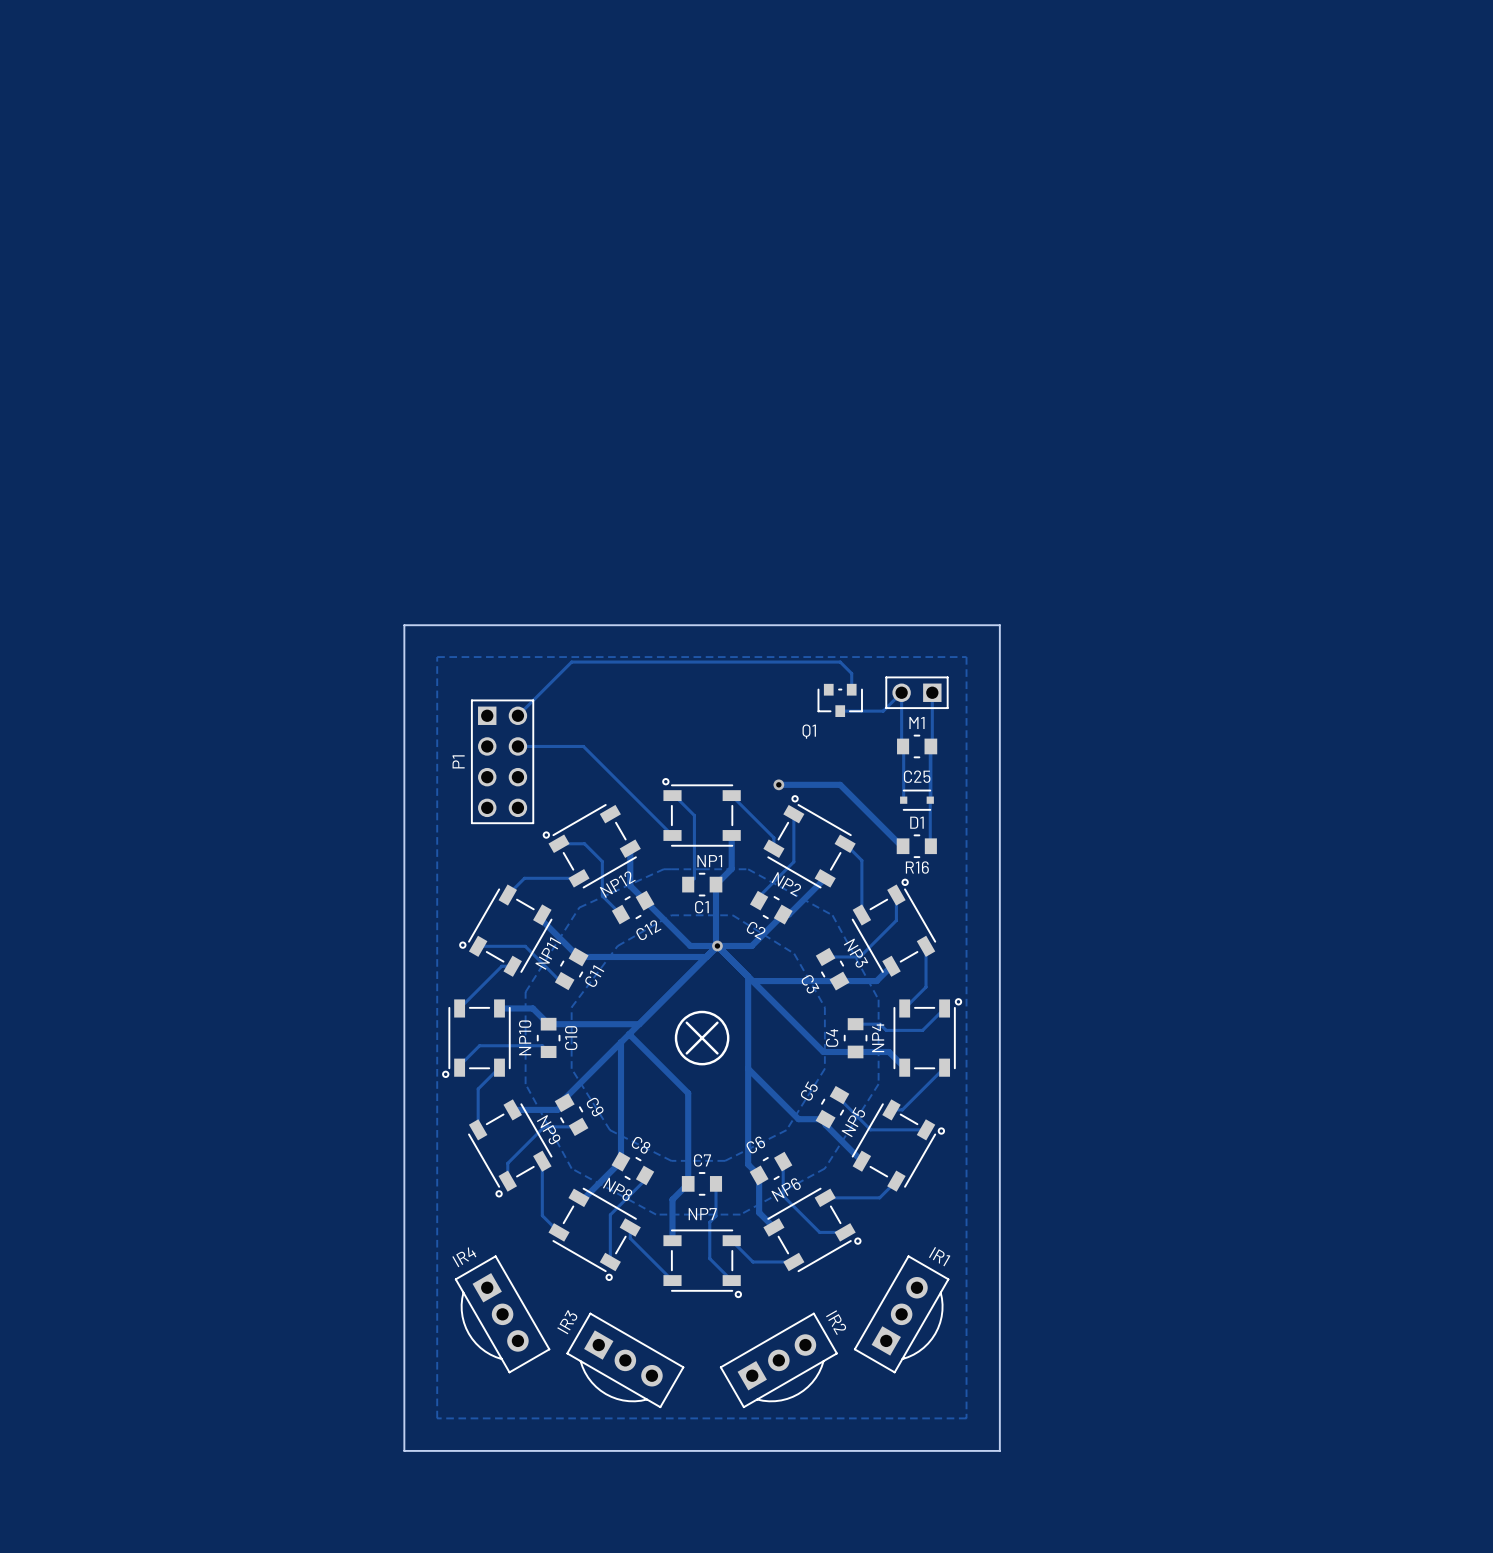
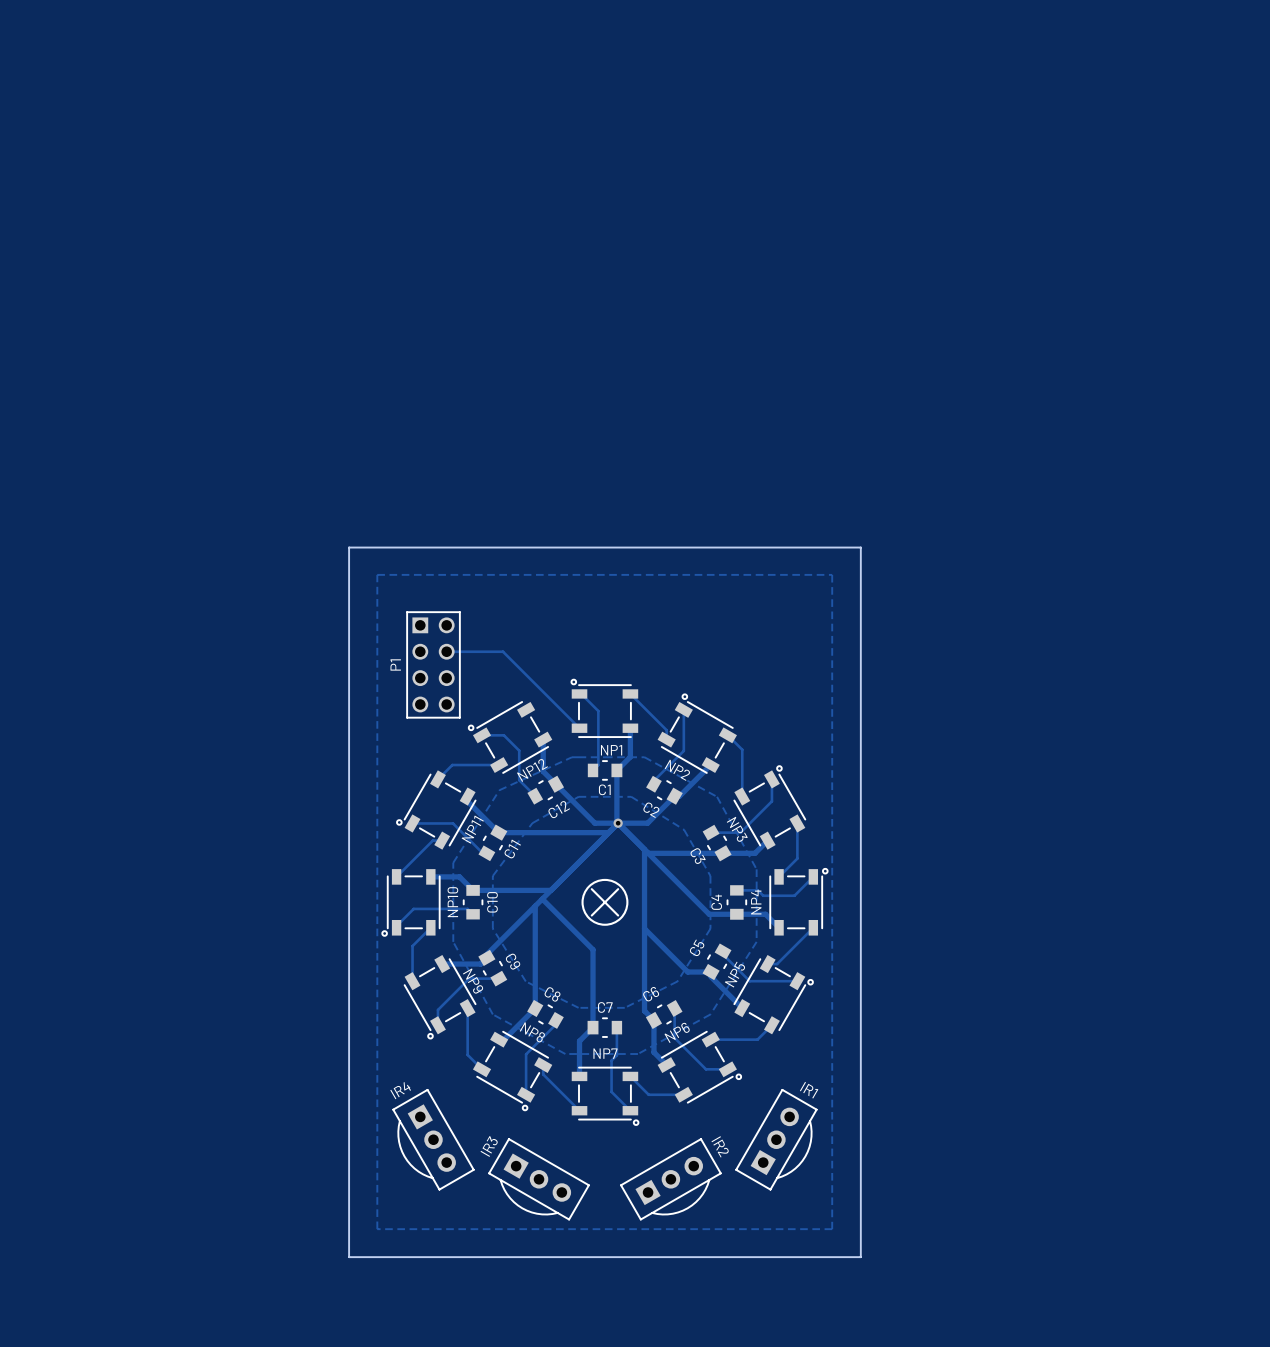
track: (851, 689) (851, 673) (840, 662) (571, 662) (517, 715) -> none
M1: (916, 692) -> none
track: (932, 692) (932, 745) (930, 747) (930, 846) -> none
Q1: (840, 700) -> none
track: (840, 711) (883, 711) (901, 692) (903, 800) -> none
C25: (917, 746) -> none
track: (778, 784) (840, 784) (903, 846) -> none
via: (778, 784) -> none
D1: (916, 800) -> none
R16: (916, 846) -> none

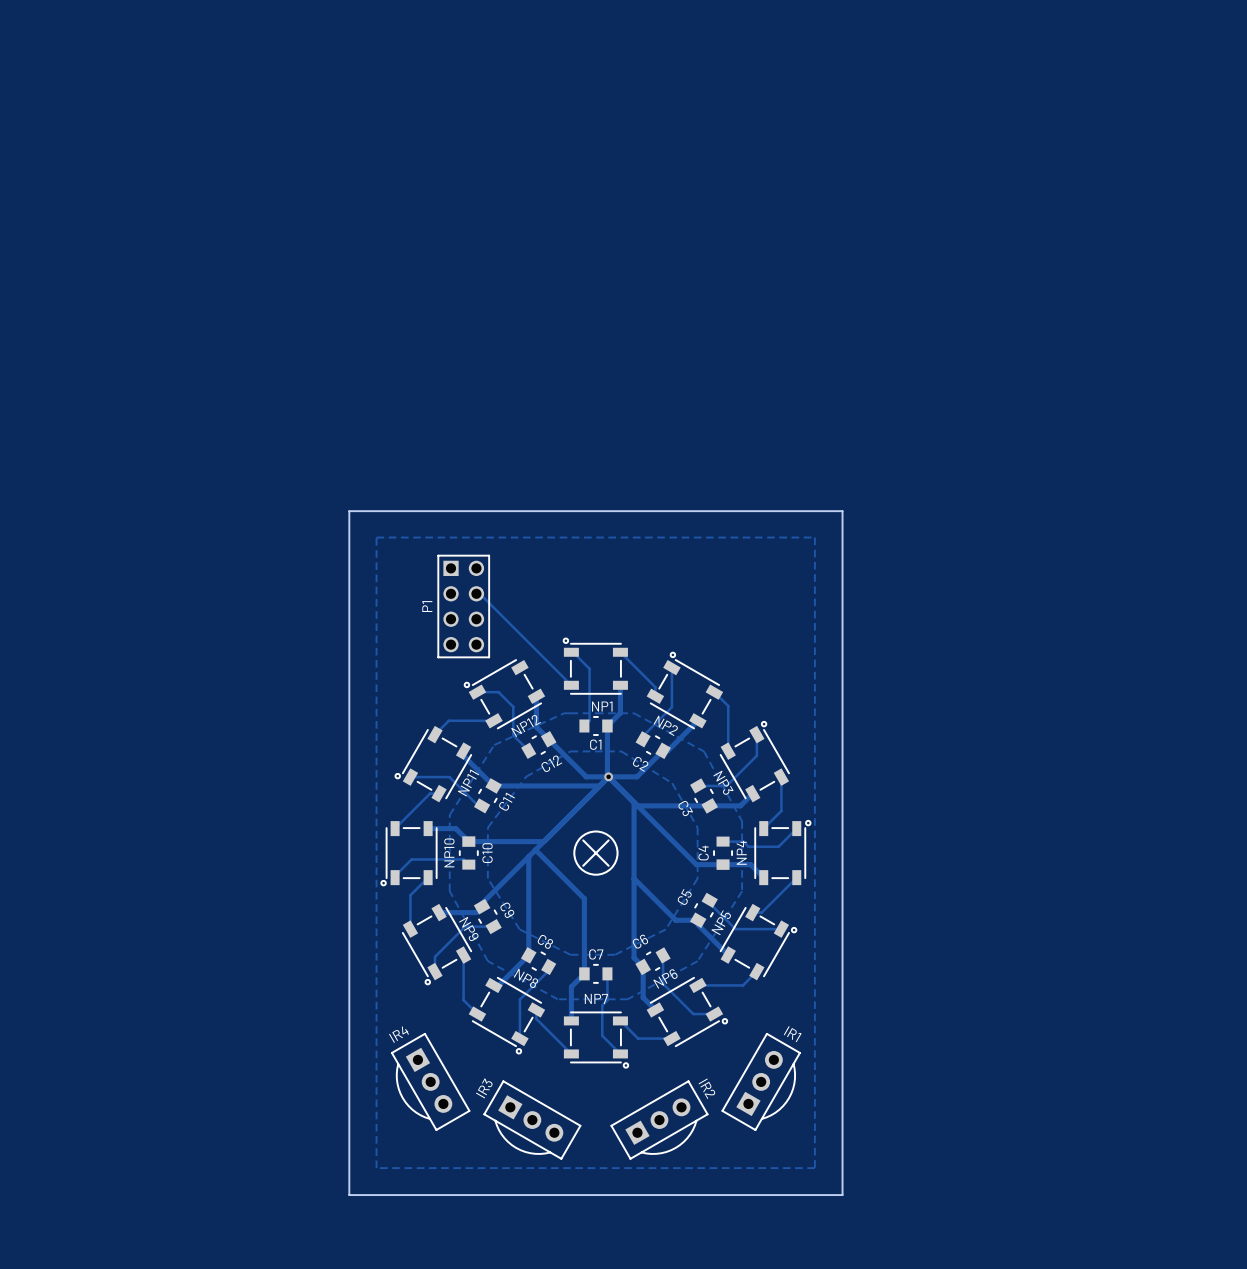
track: (446, 651) (503, 651) -> (476, 593) (479, 593) (497, 611)
P1 position: (433, 664) -> (463, 606)

